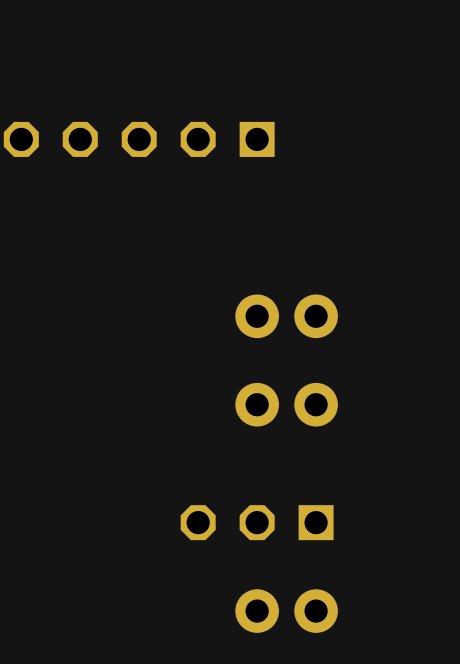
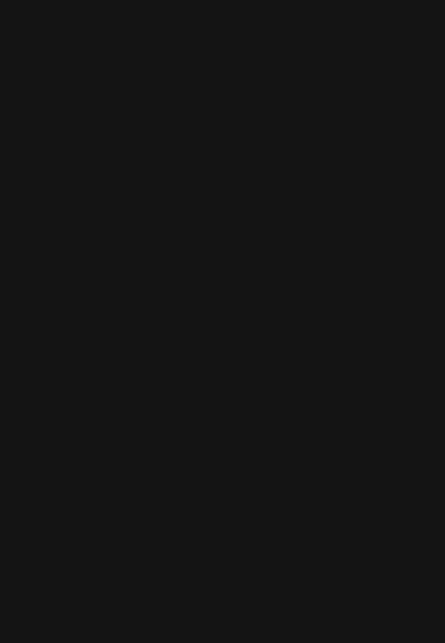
part: (139, 139) -> none
part: (286, 316) -> none
part: (286, 404) -> none
part: (257, 522) -> none
part: (286, 611) -> none

